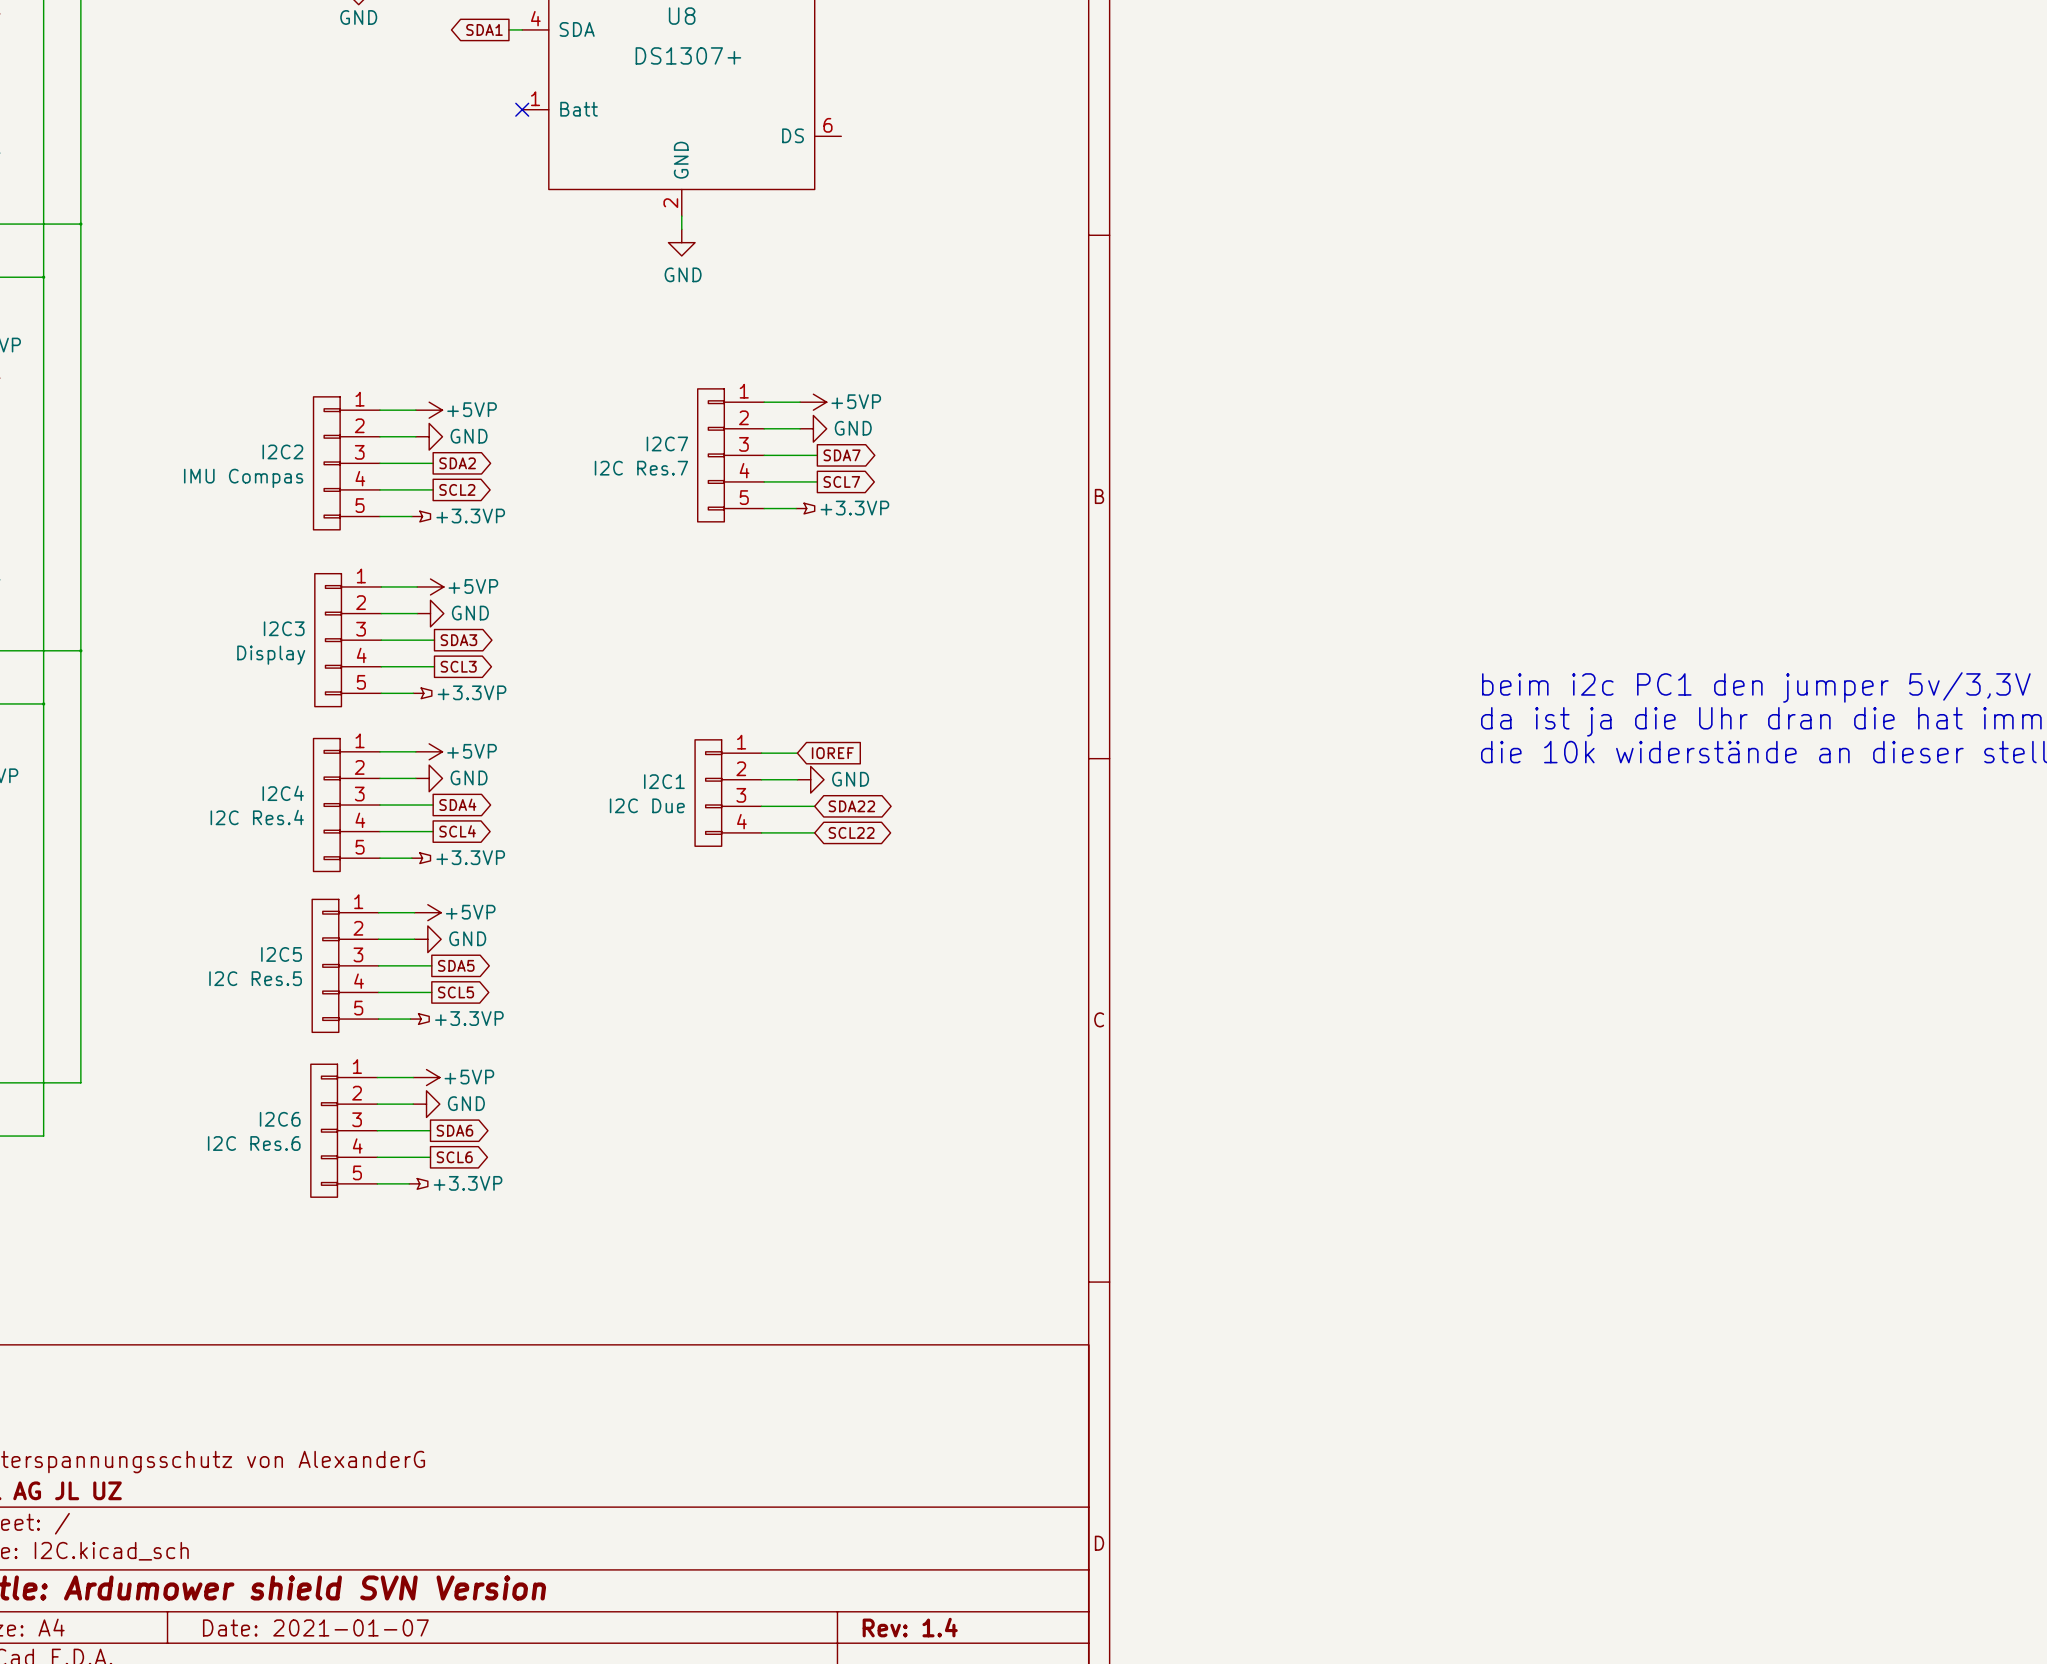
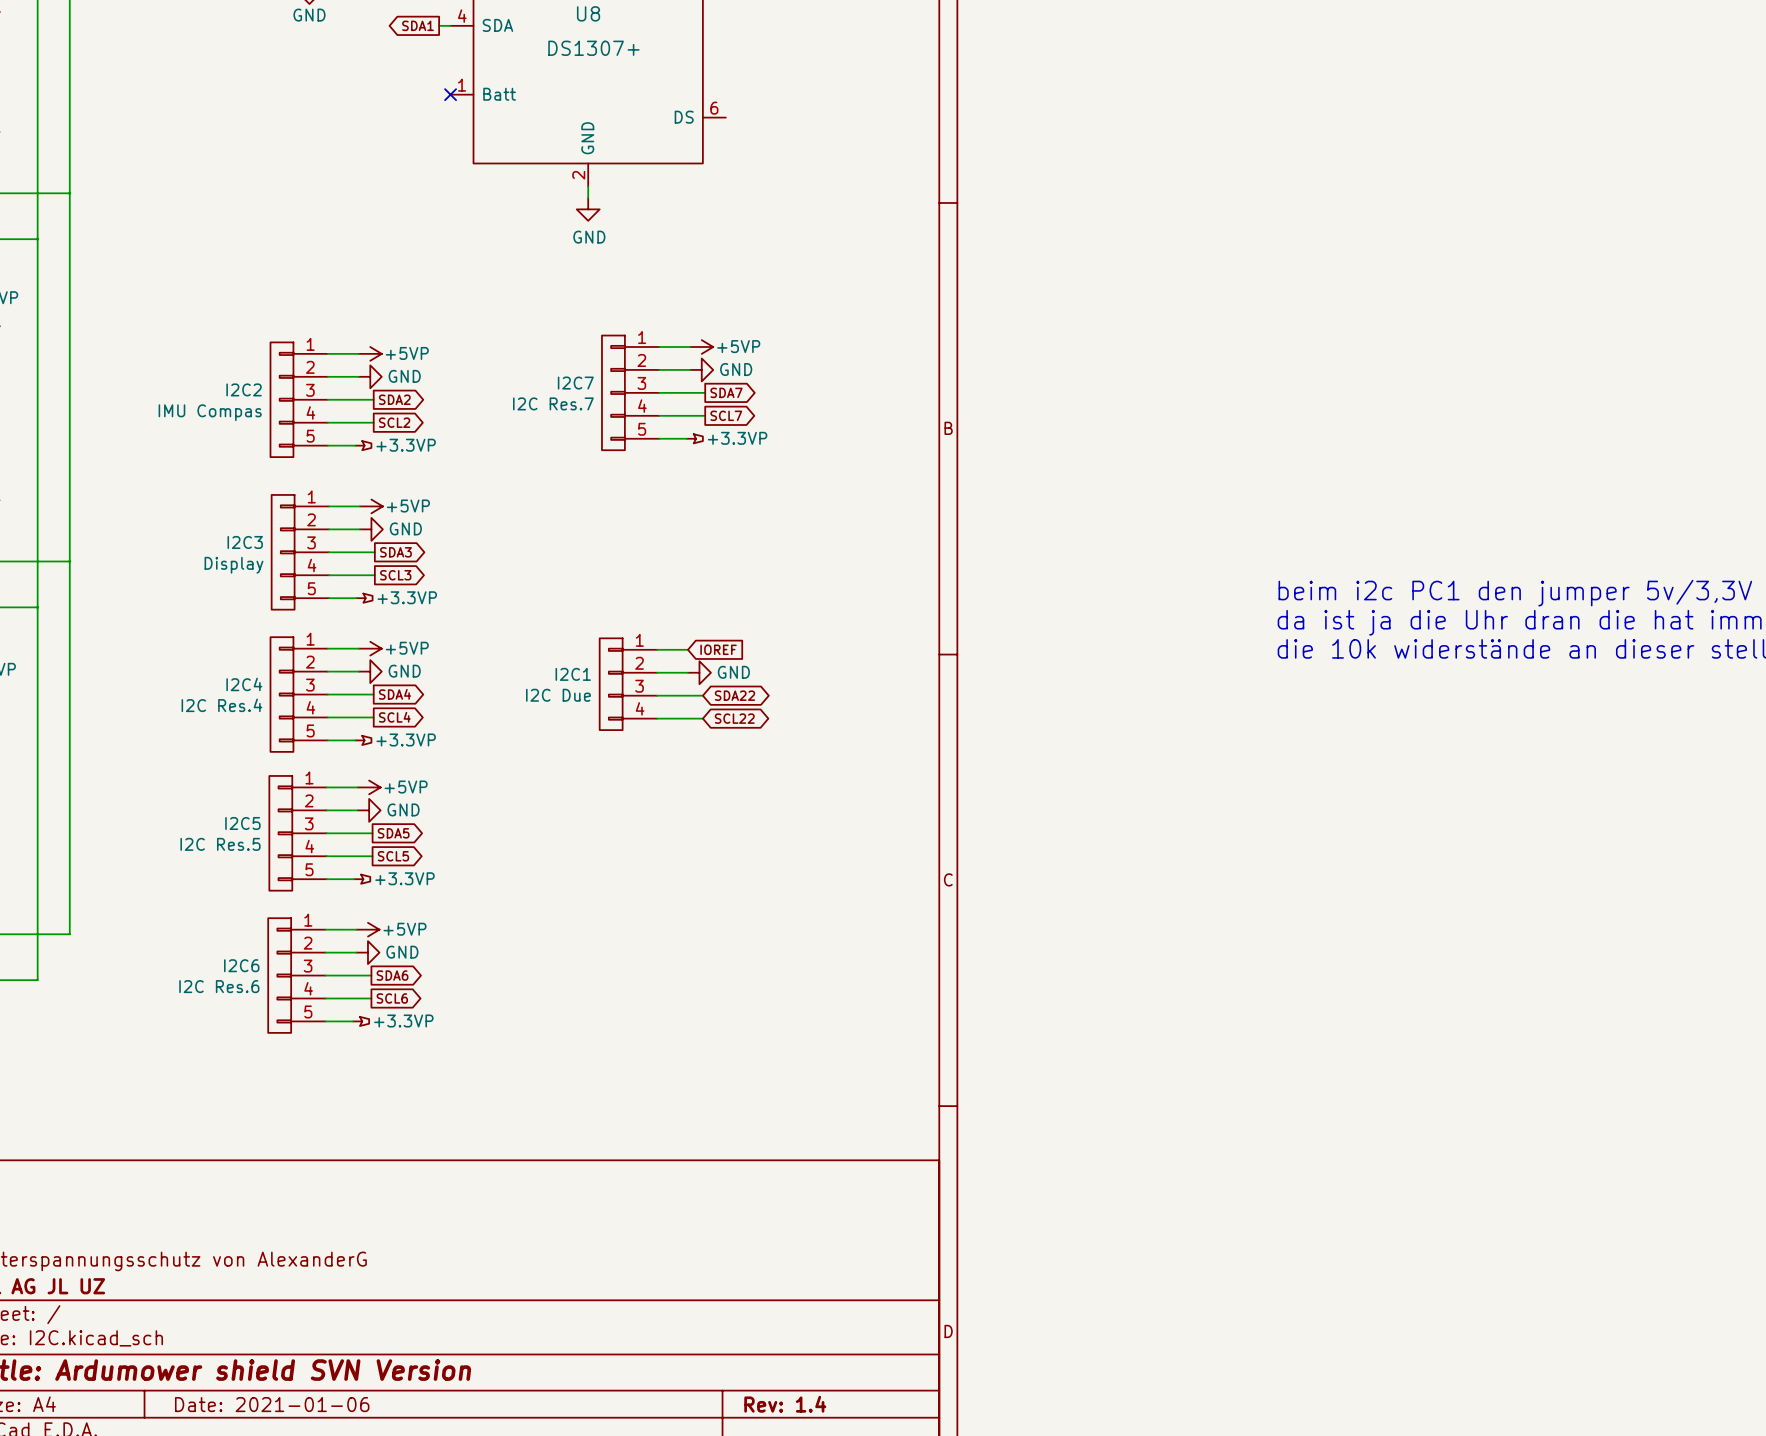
title block: Date: 2021-01-07 (315, 1627) -> Date: 2021-01-06 (272, 1404)

